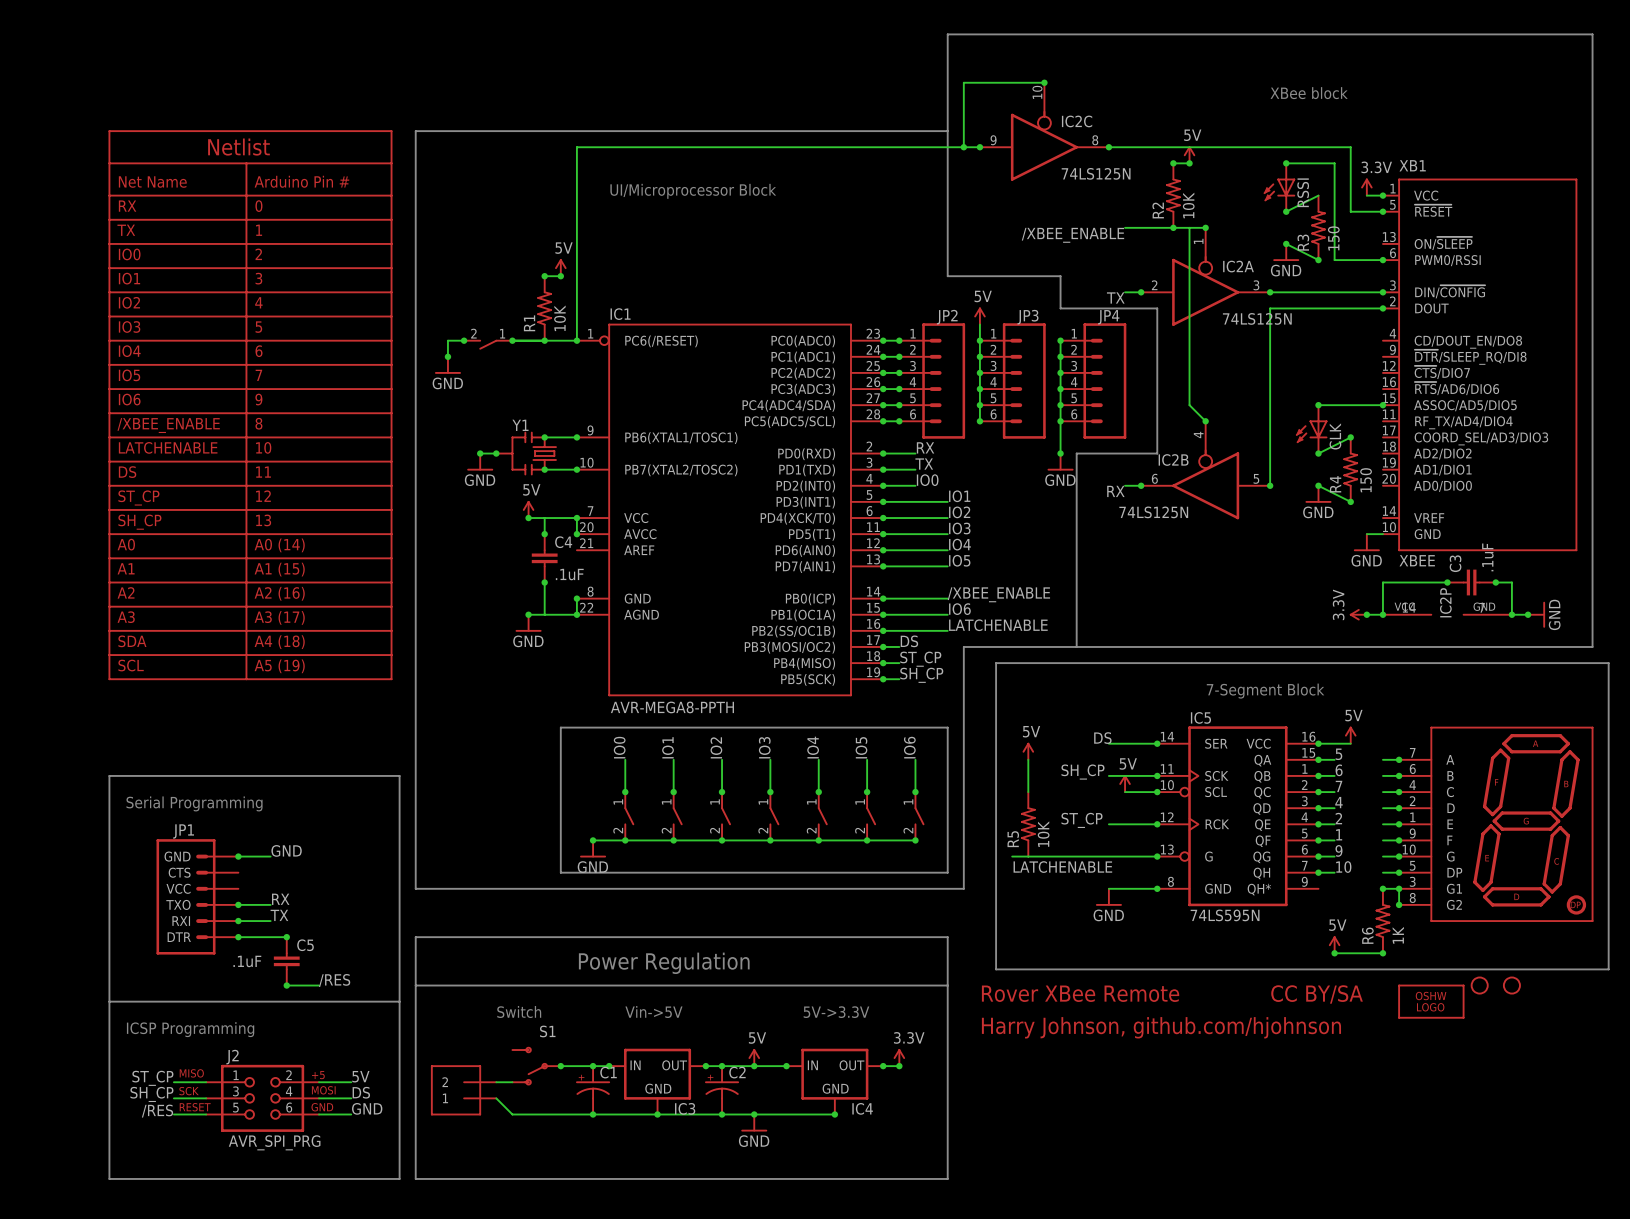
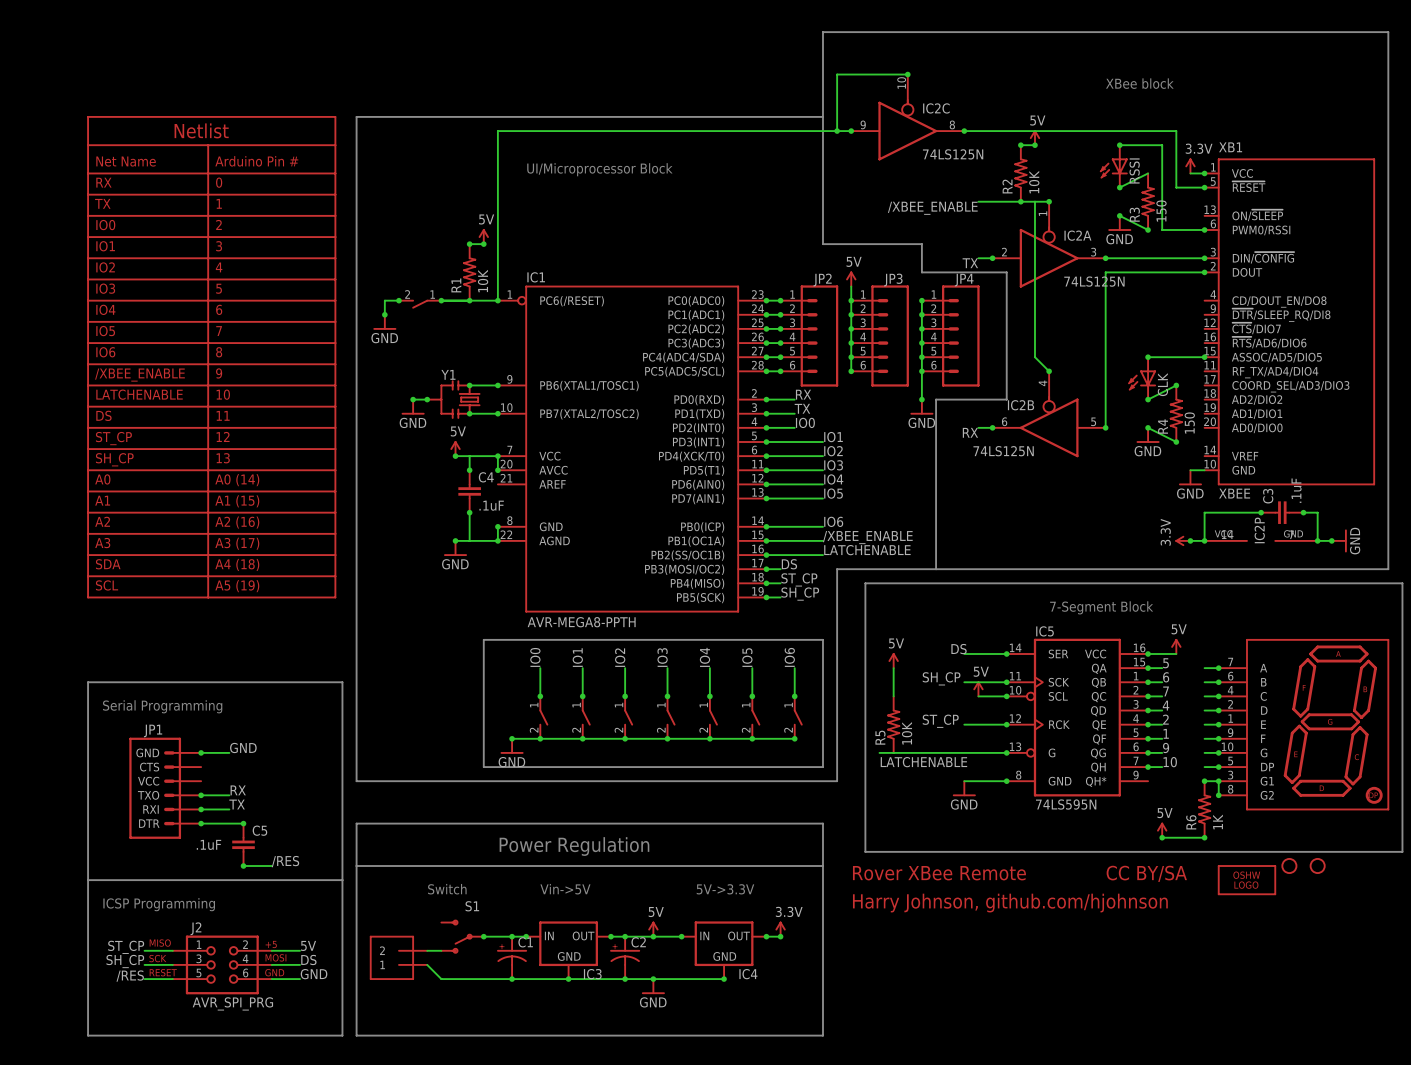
text: 9 (258, 399) -> 8 (219, 352)
text: 8 (258, 423) -> 9 (219, 373)
label: /XBEE_ENABLE (998, 594) -> IO6 (833, 521)
label: IO6 (959, 609) -> /XBEE_ENABLE (867, 537)

